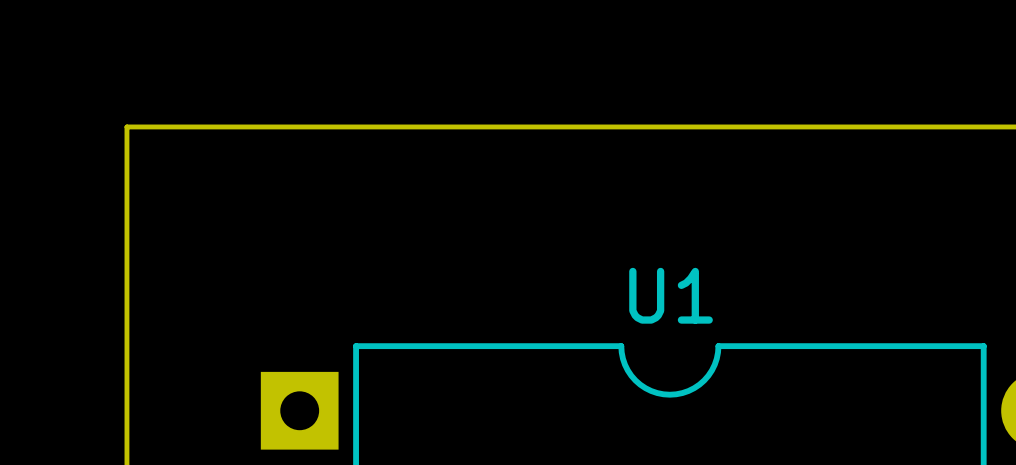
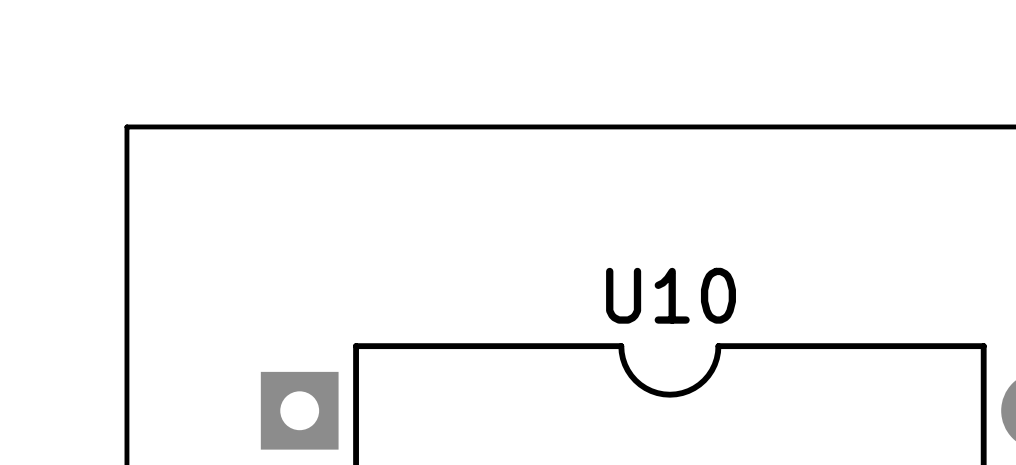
U1 name: U1 (671, 295) -> U10 (671, 295)

